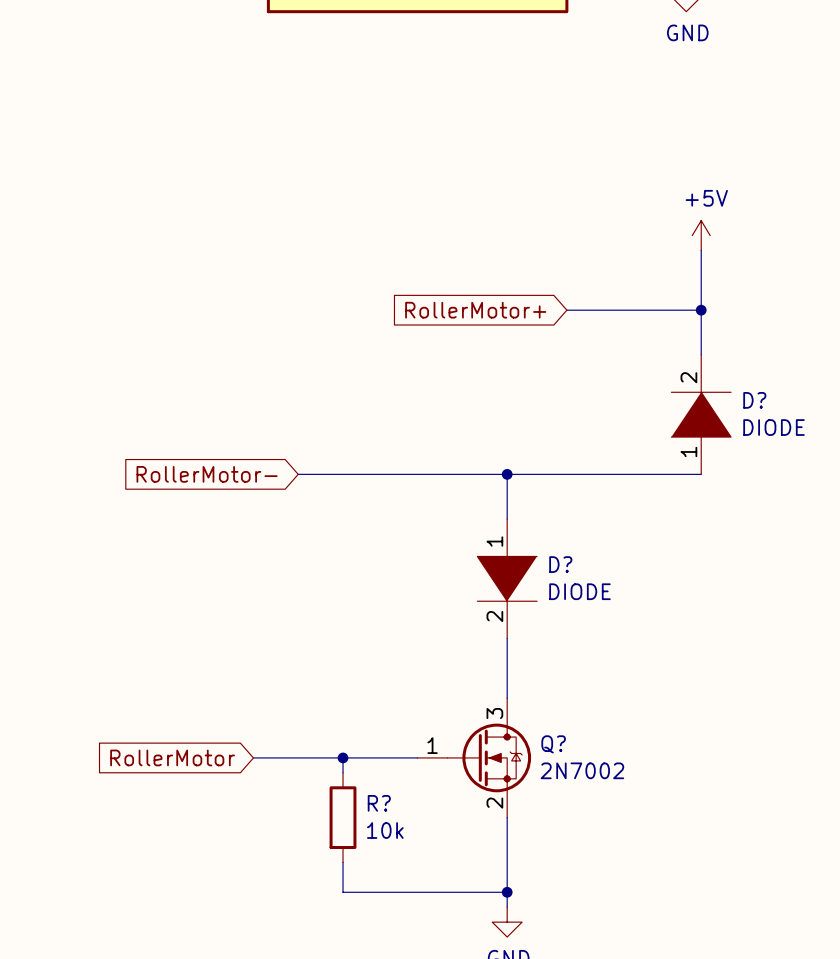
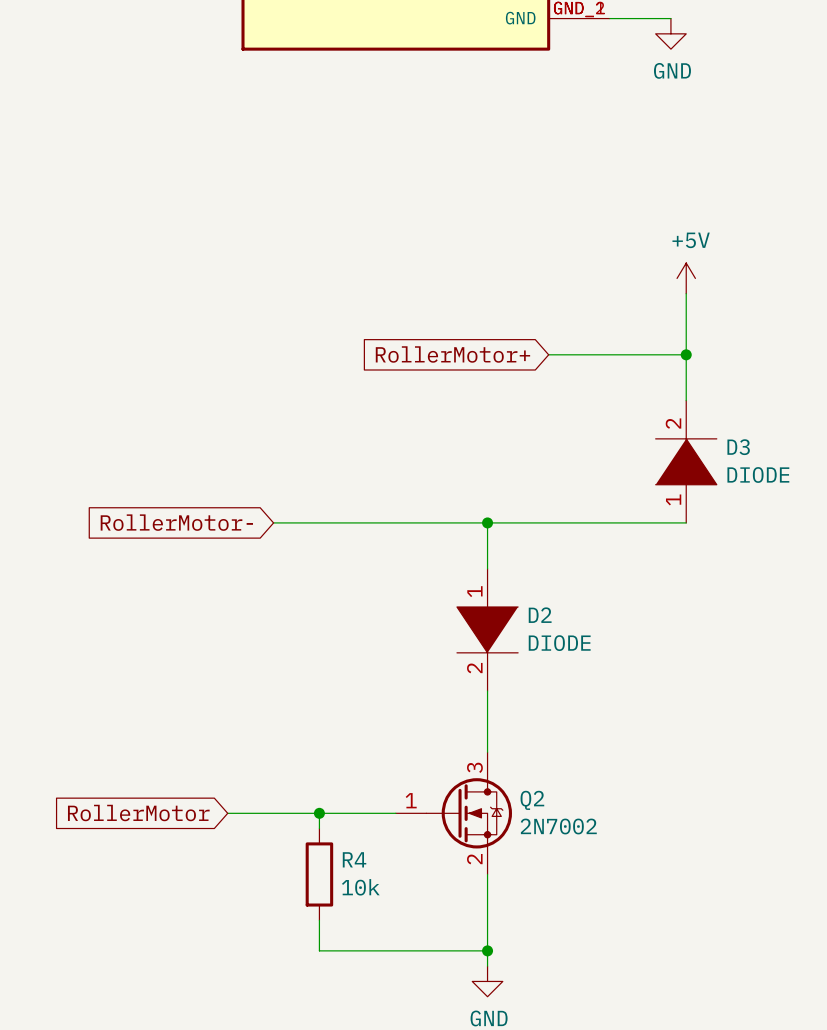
D? name: D? (754, 400) -> D3 (738, 447)
D? name: D? (560, 564) -> D2 (540, 615)
Q? name: Q? (553, 744) -> Q2 (532, 800)
R? name: R? (379, 803) -> R4 (354, 859)

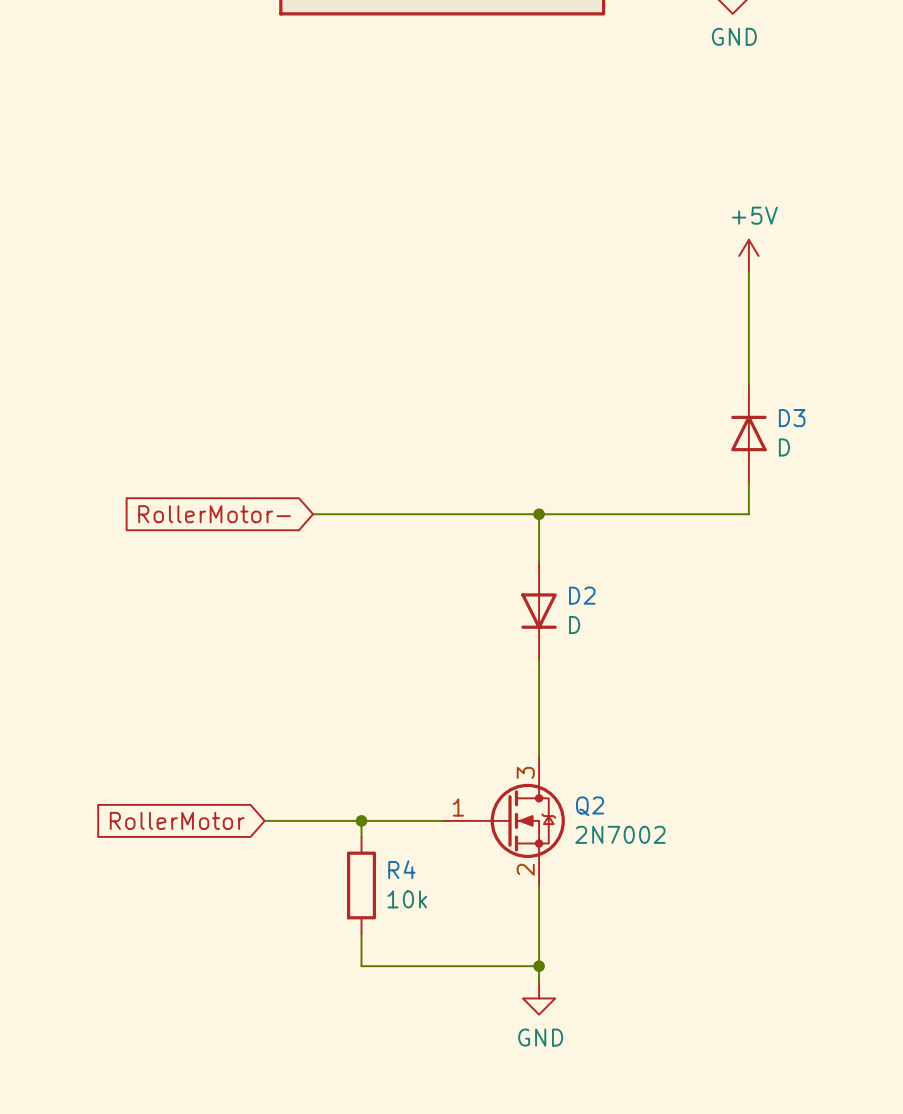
global label: RollerMotor+ (452, 354) -> none
wire: (548, 354) (686, 354) -> none
junction: (686, 354) -> none
D3 symbol: [655, 400, 717, 523] -> [731, 385, 767, 482]
D3 value: DIODE (758, 474) -> D (784, 447)
D2 symbol: [456, 568, 519, 692] -> [521, 562, 557, 660]
D2 value: DIODE (559, 643) -> D (574, 625)

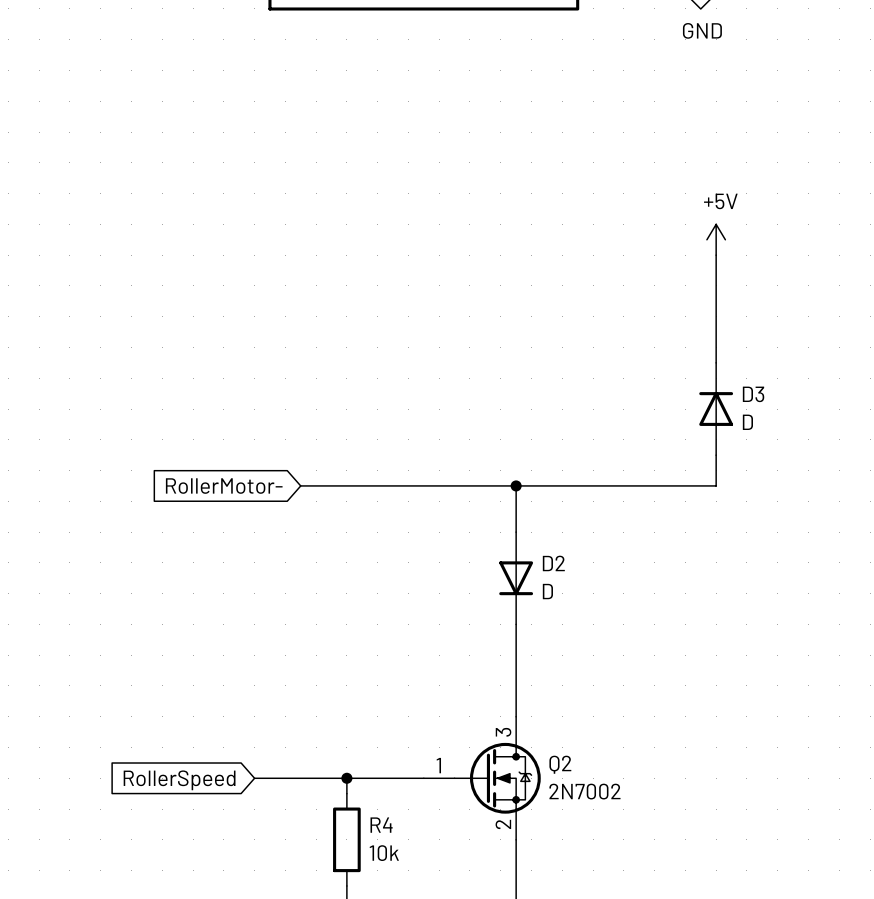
global label: RollerMotor (177, 820) -> RollerSpeed (179, 780)

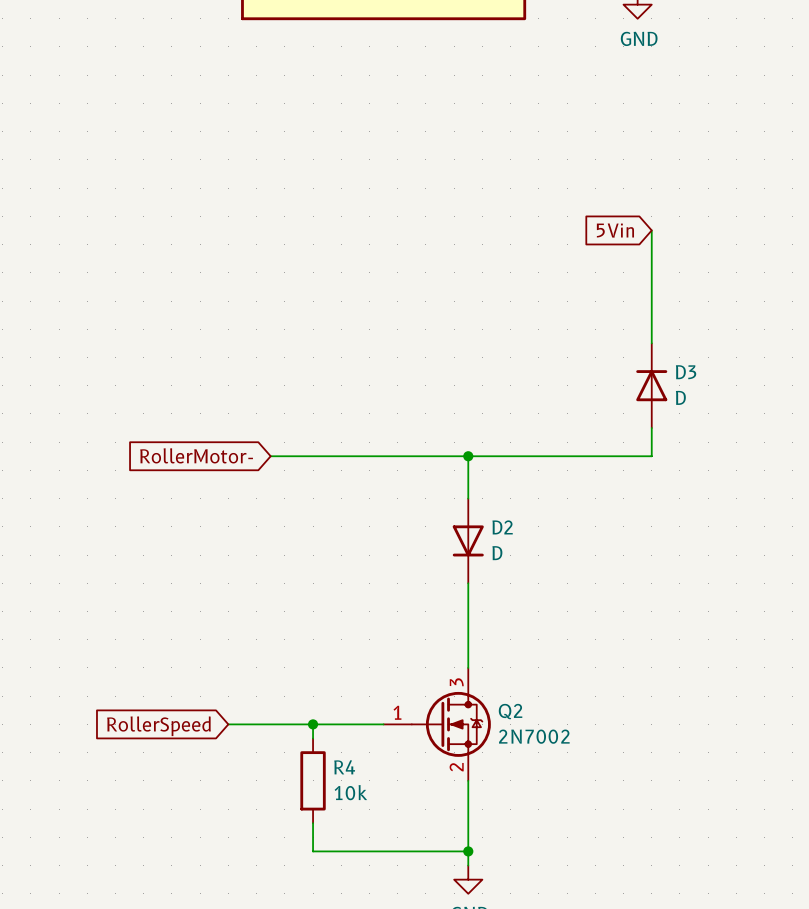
global label: none -> 5Vin (615, 230)
power symbol: +5V (716, 239) -> none

